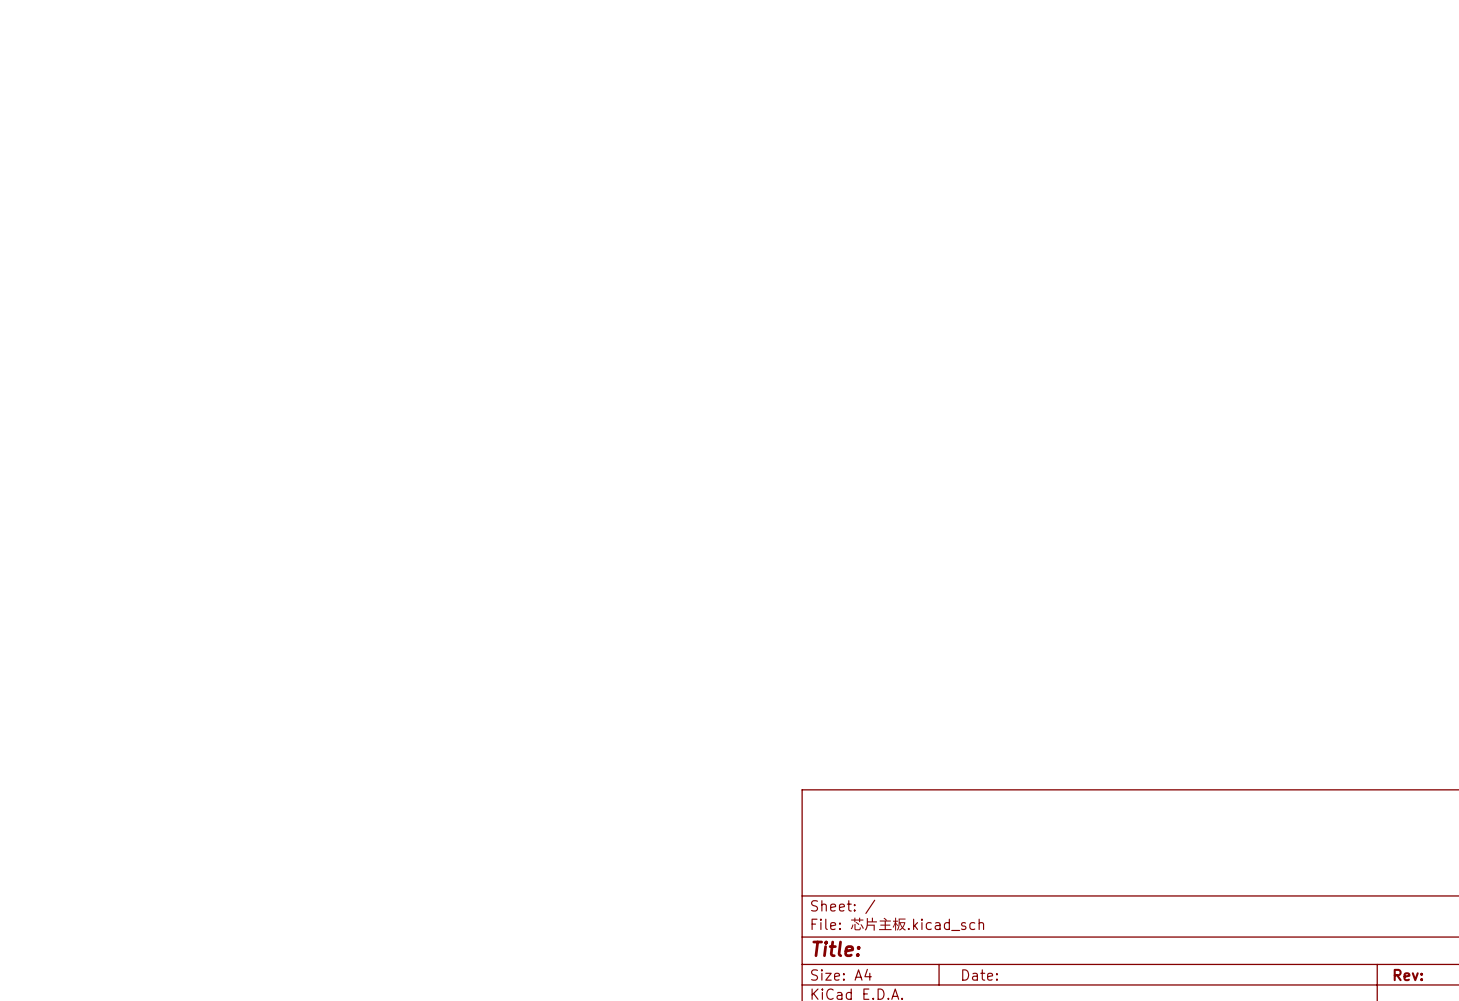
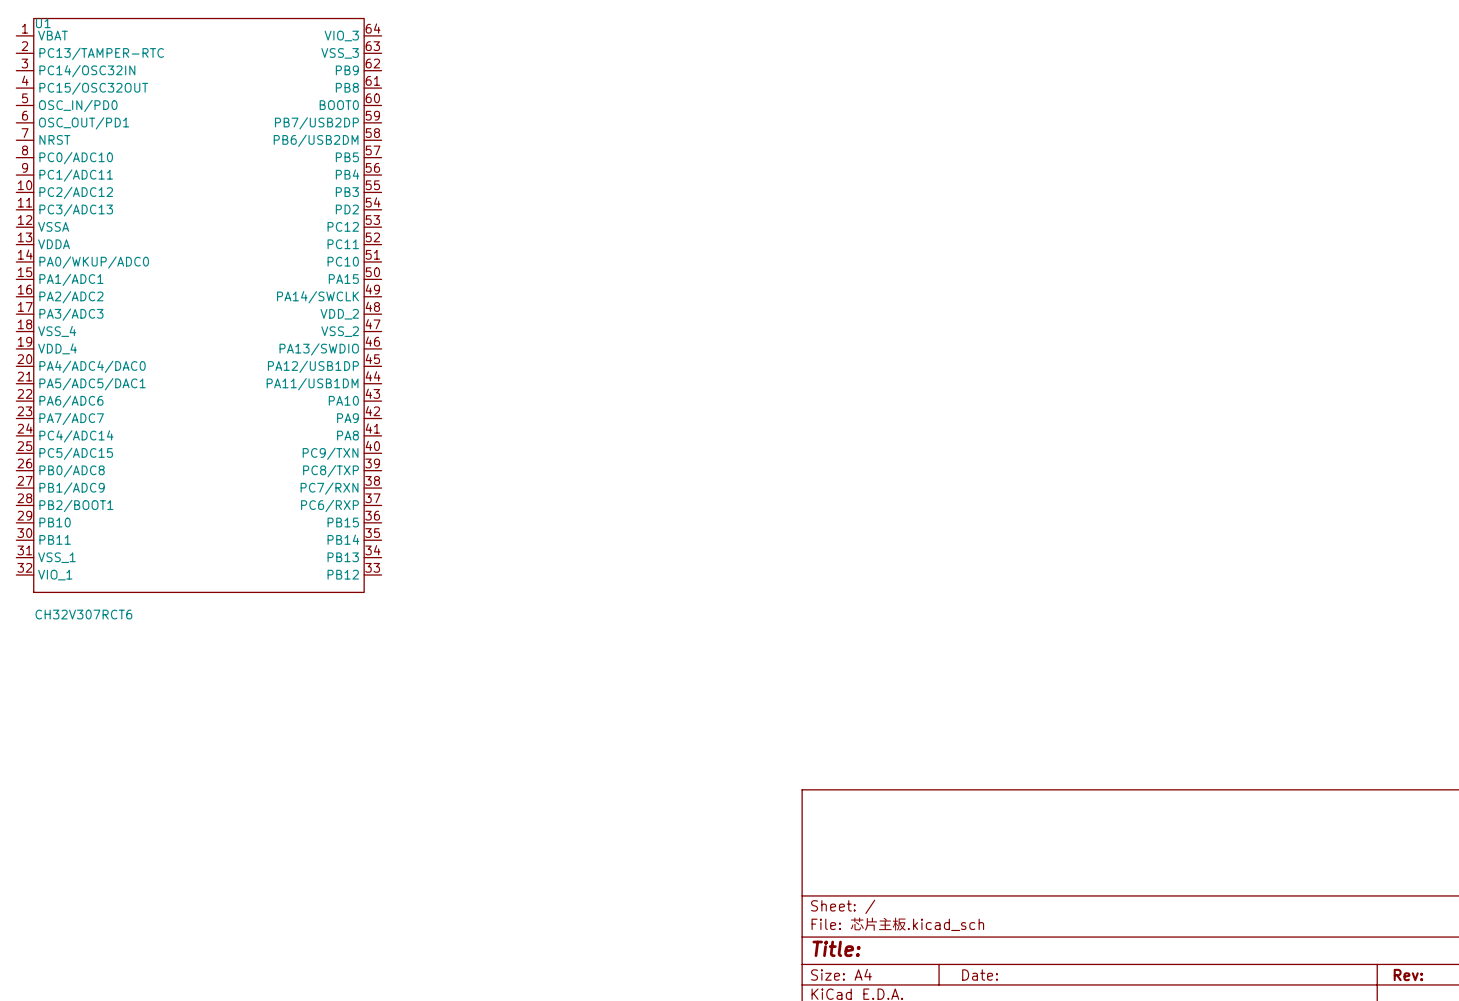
U1: none -> (198, 305)

